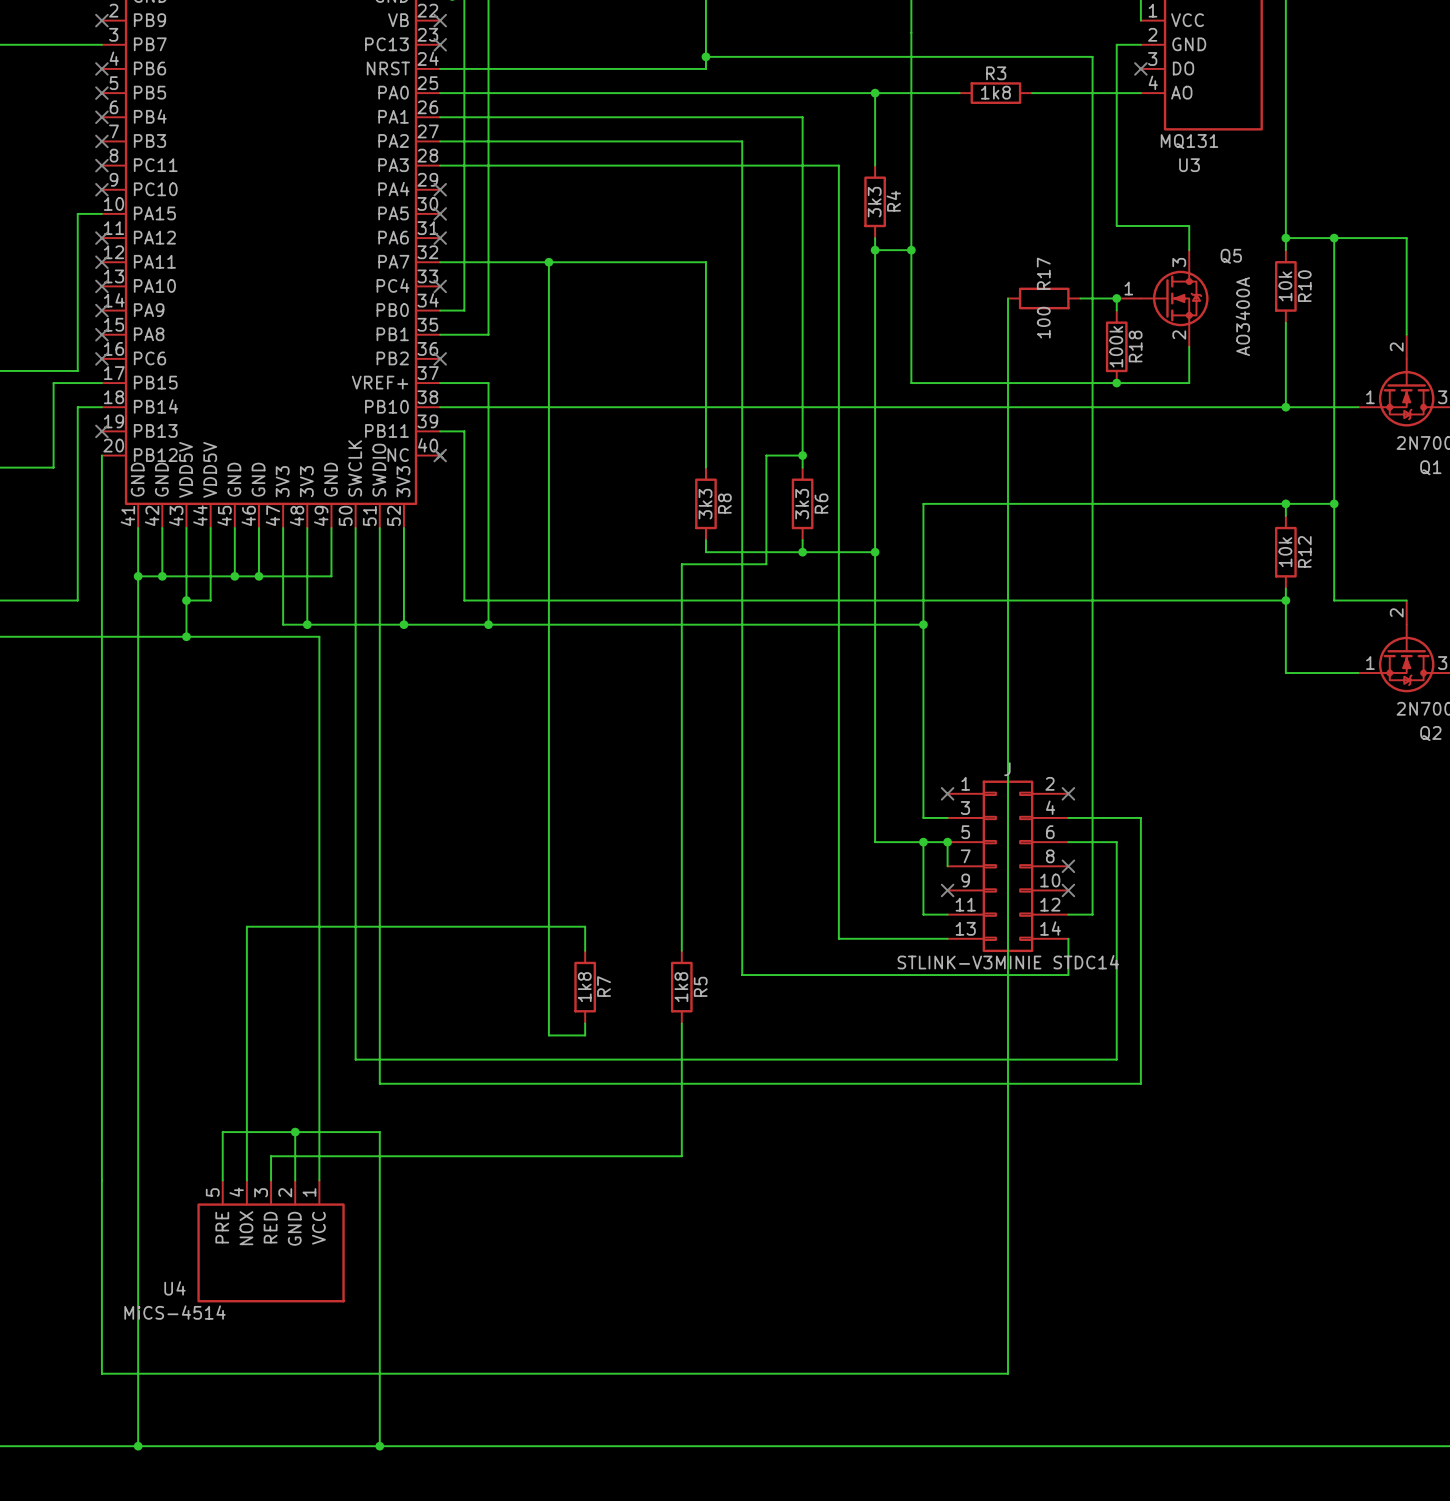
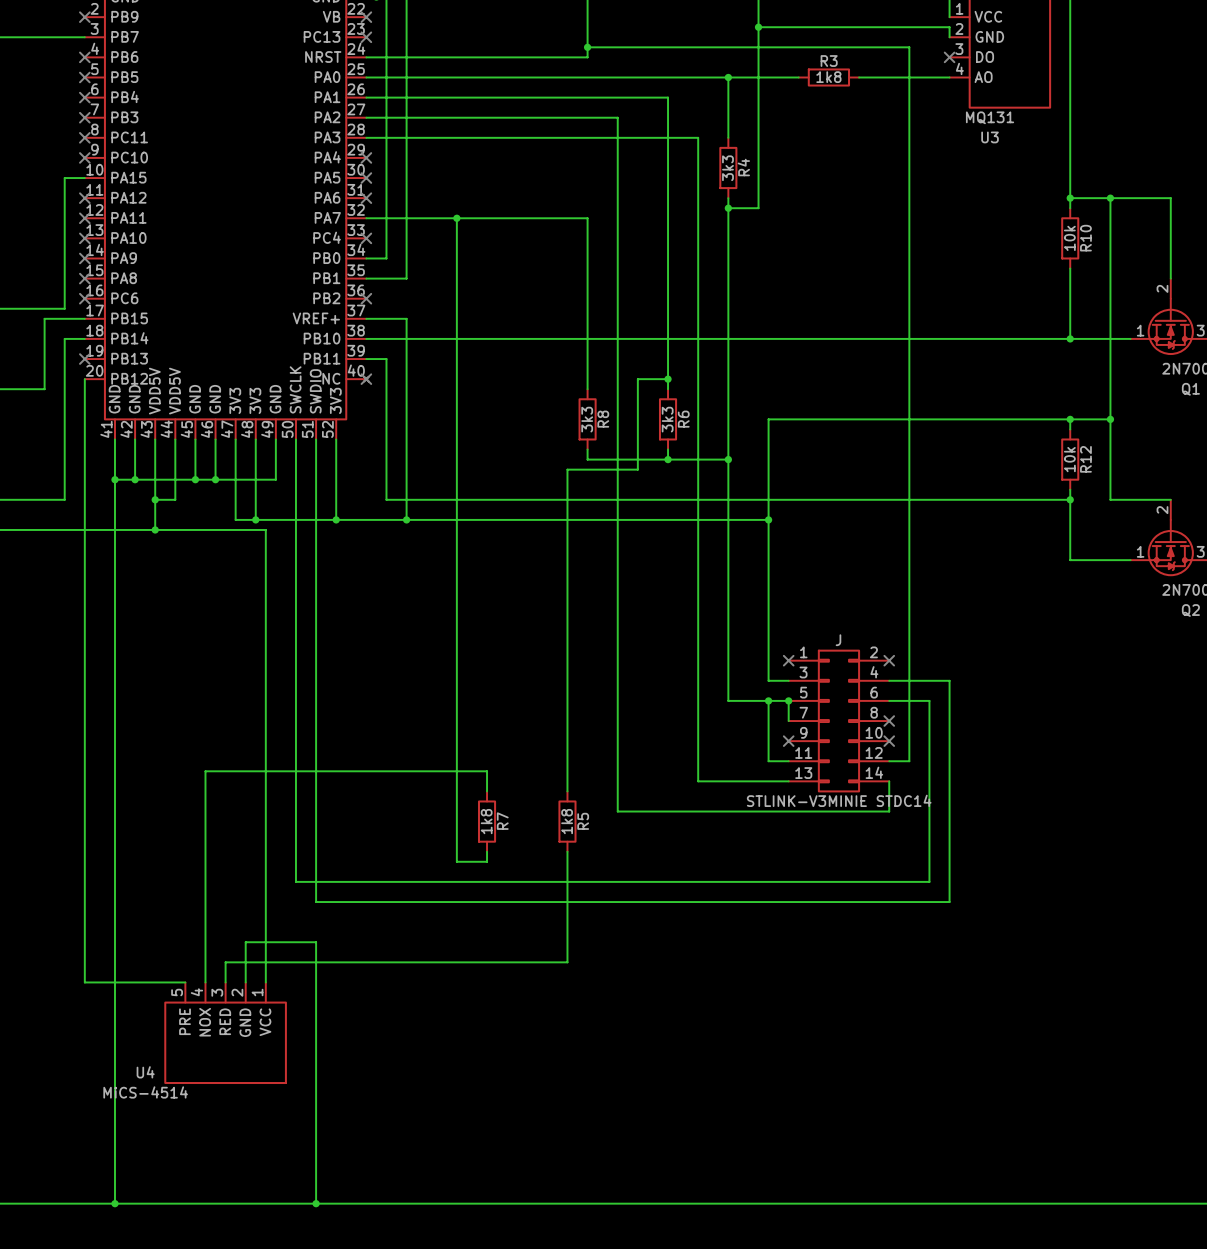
junction: none -> (758, 27)
wire: (1140, 44) (1116, 44) (1116, 226) (1189, 226) (1189, 250) -> (949, 37) (949, 27) (758, 27)
wire: (911, 250) (911, 383) (1189, 383) (1189, 346) -> none
junction: (911, 250) -> none
wire: (1008, 298) (1008, 1373) (101, 1373) (101, 1180) -> none
R17: 100 (1044, 298) -> none
wire: (1080, 298) (1116, 298) (1116, 310) -> none
junction: (1116, 298) -> none
Q5: AO3400A (1162, 298) -> none
R18: 100k (1116, 346) -> none
junction: (1116, 383) -> none
wire: (295, 1132) (222, 1132) (222, 1180) -> (84, 982) (185, 982)
junction: (295, 1132) -> none

